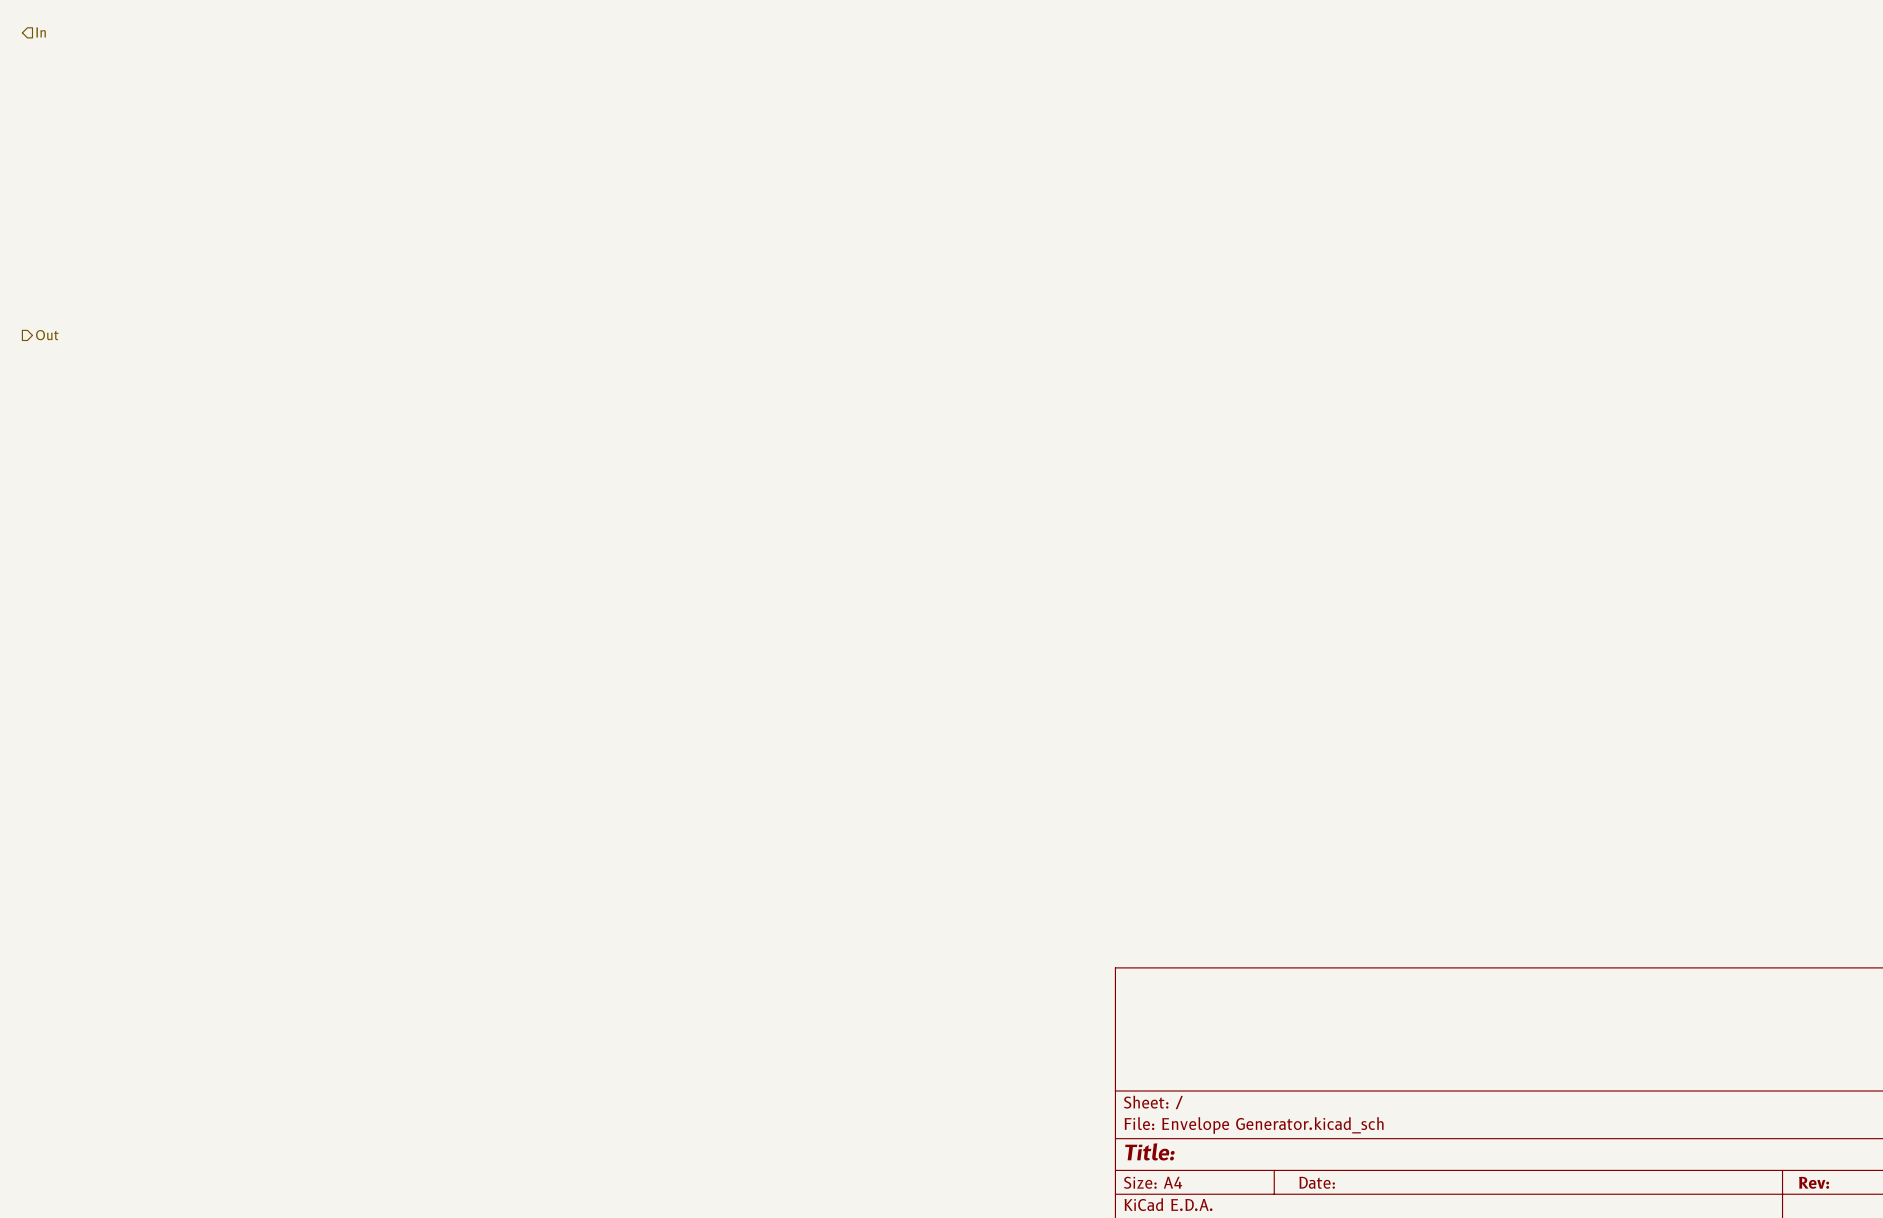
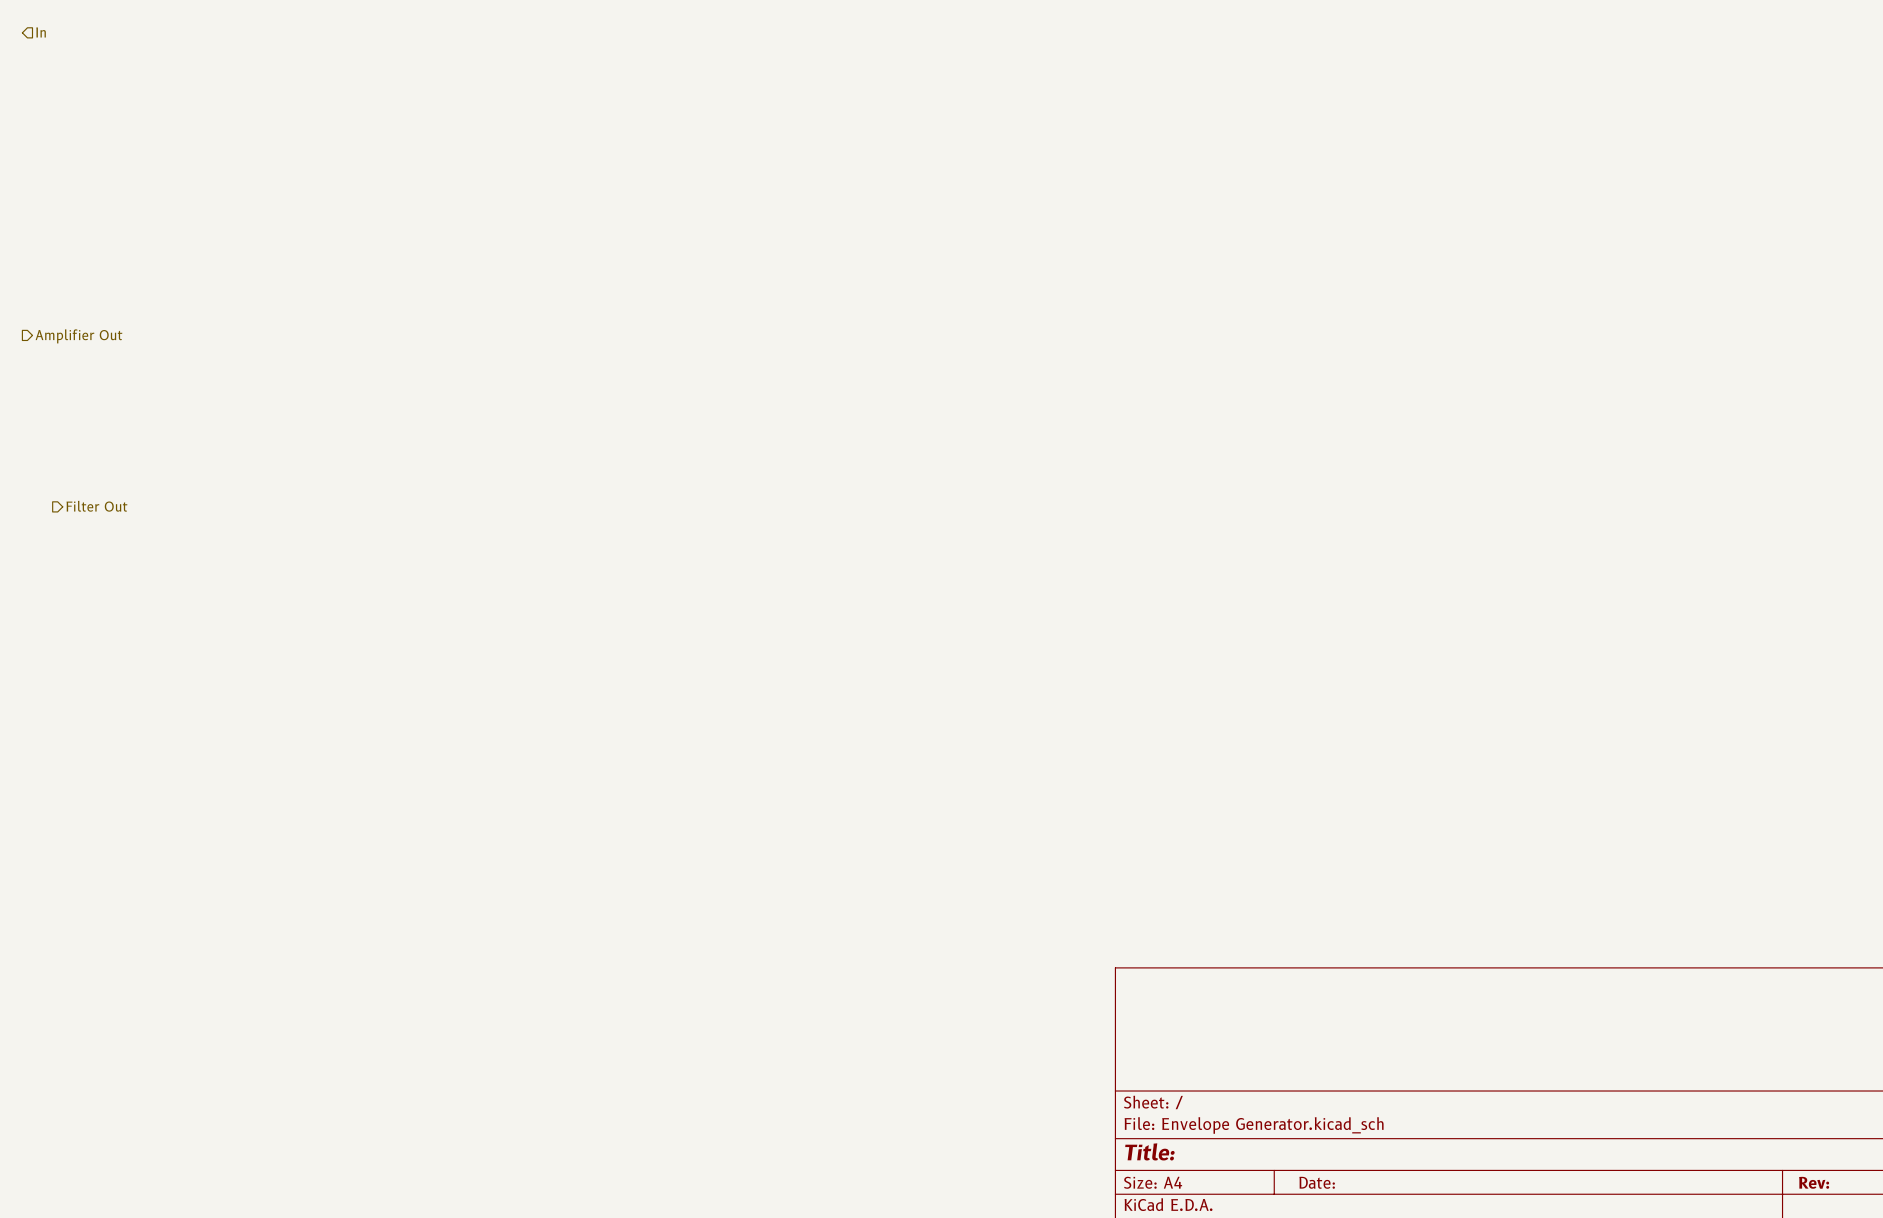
hierarchical label: Out (47, 335) -> Amplifier Out (78, 336)
hierarchical label: none -> Filter Out (96, 506)

